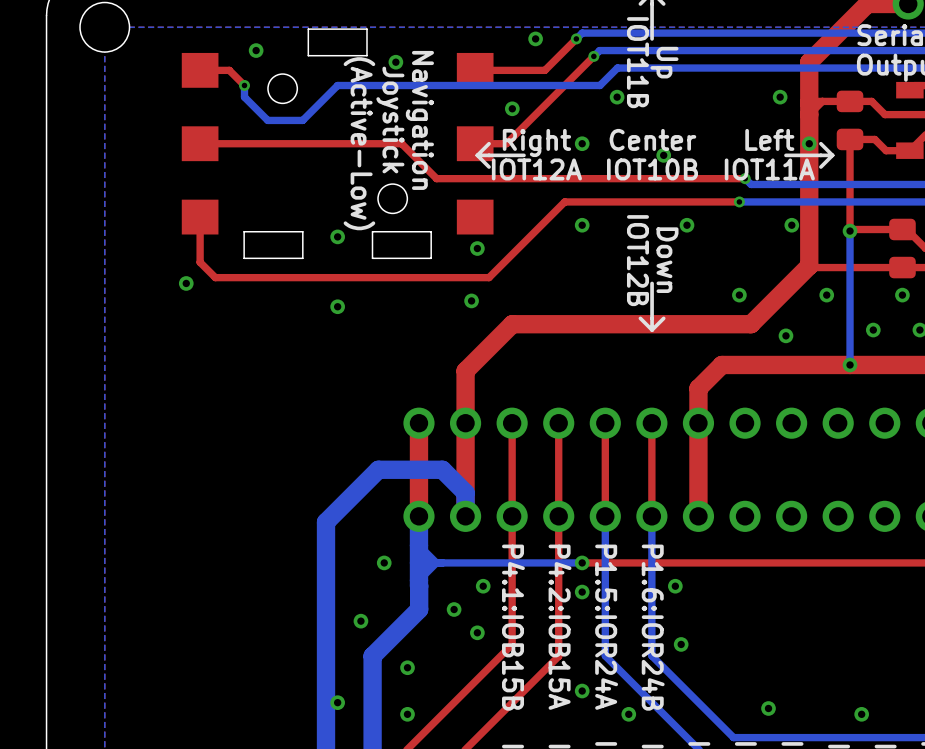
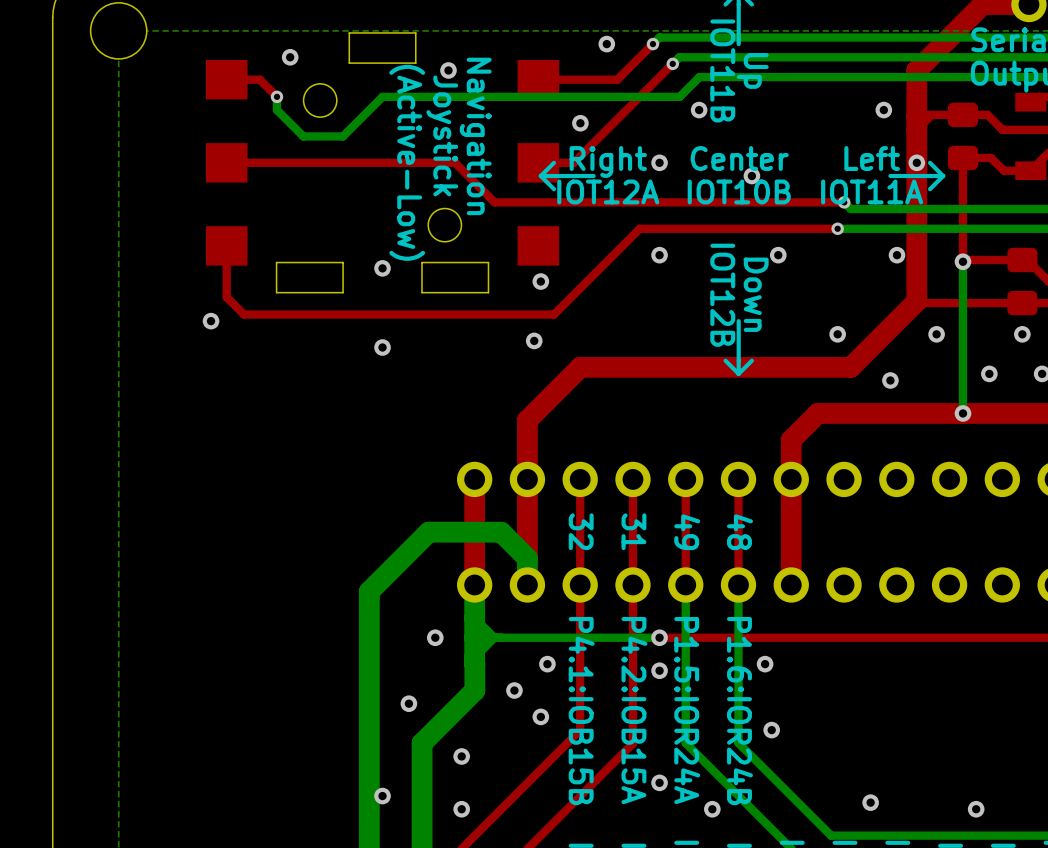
text: none -> 32 (581, 531)
text: none -> 31 (633, 531)
text: none -> 49 (687, 532)
text: none -> 48 (739, 532)

